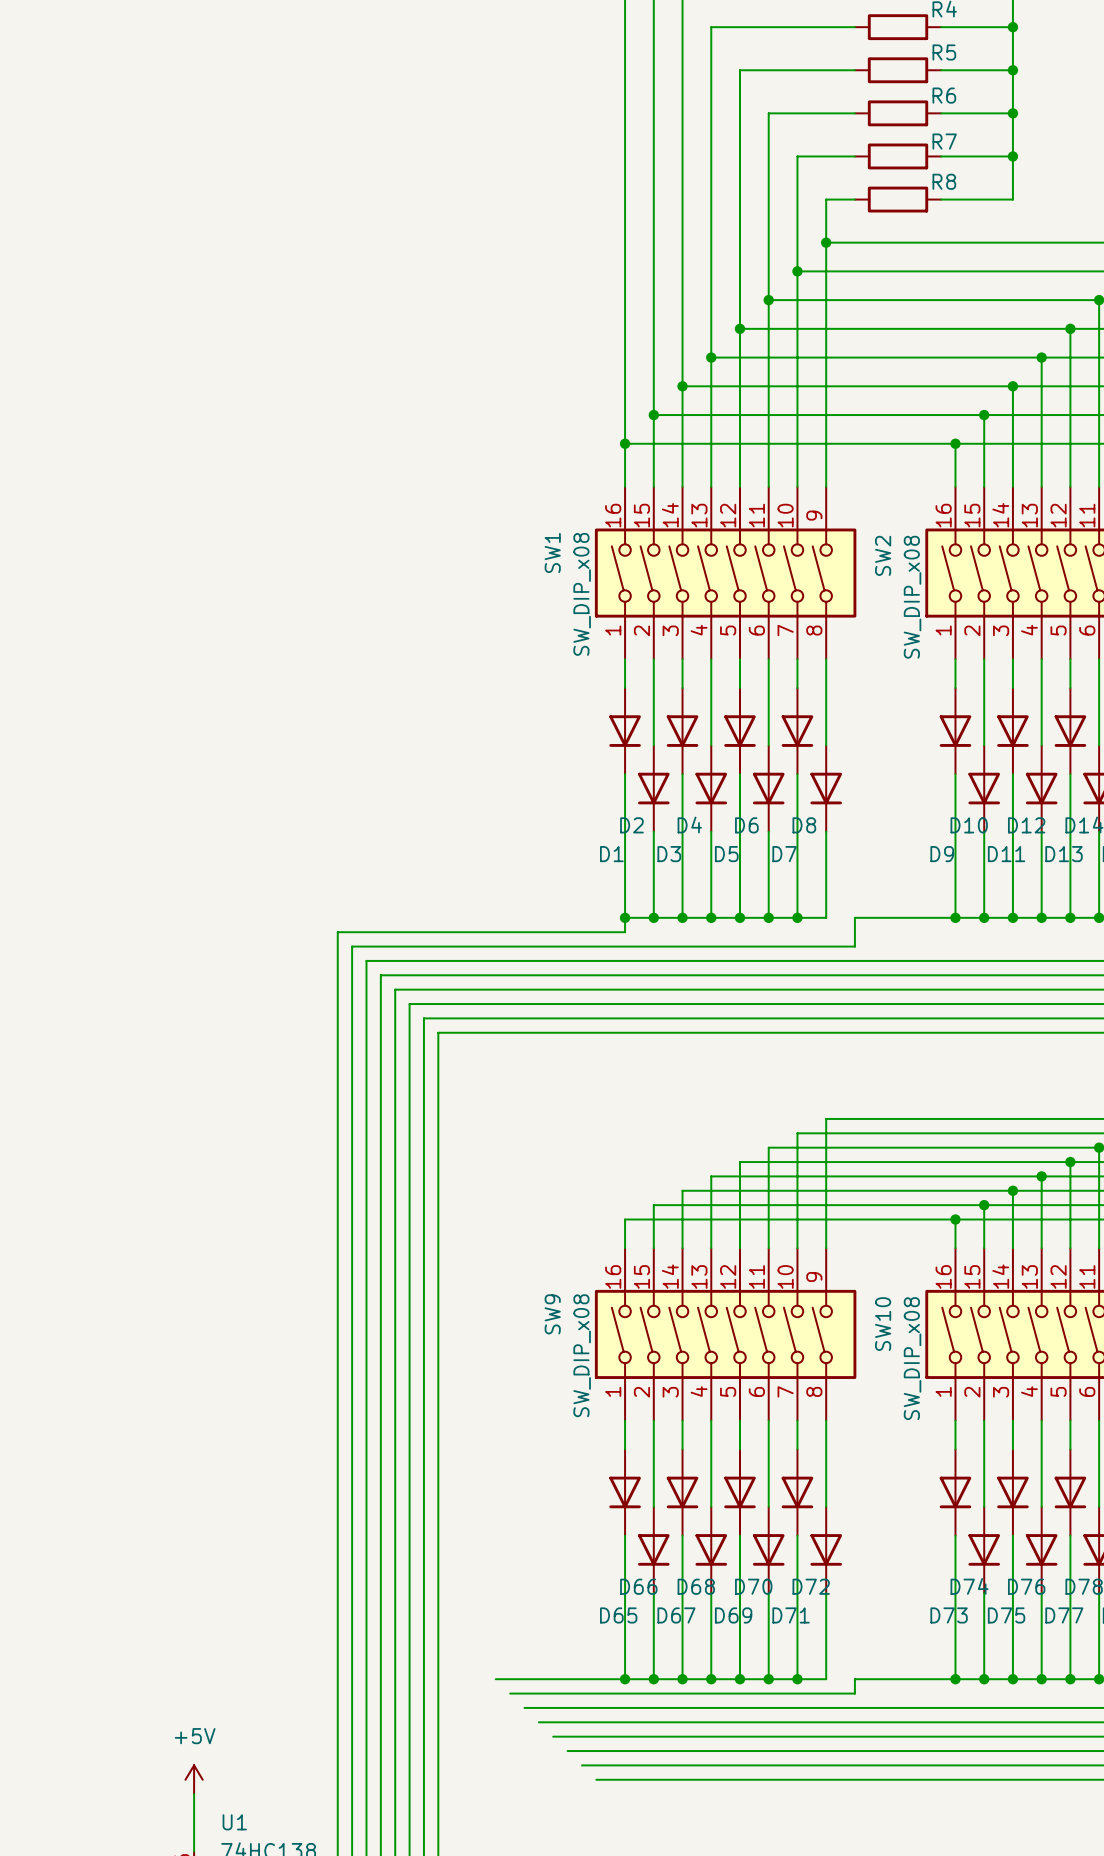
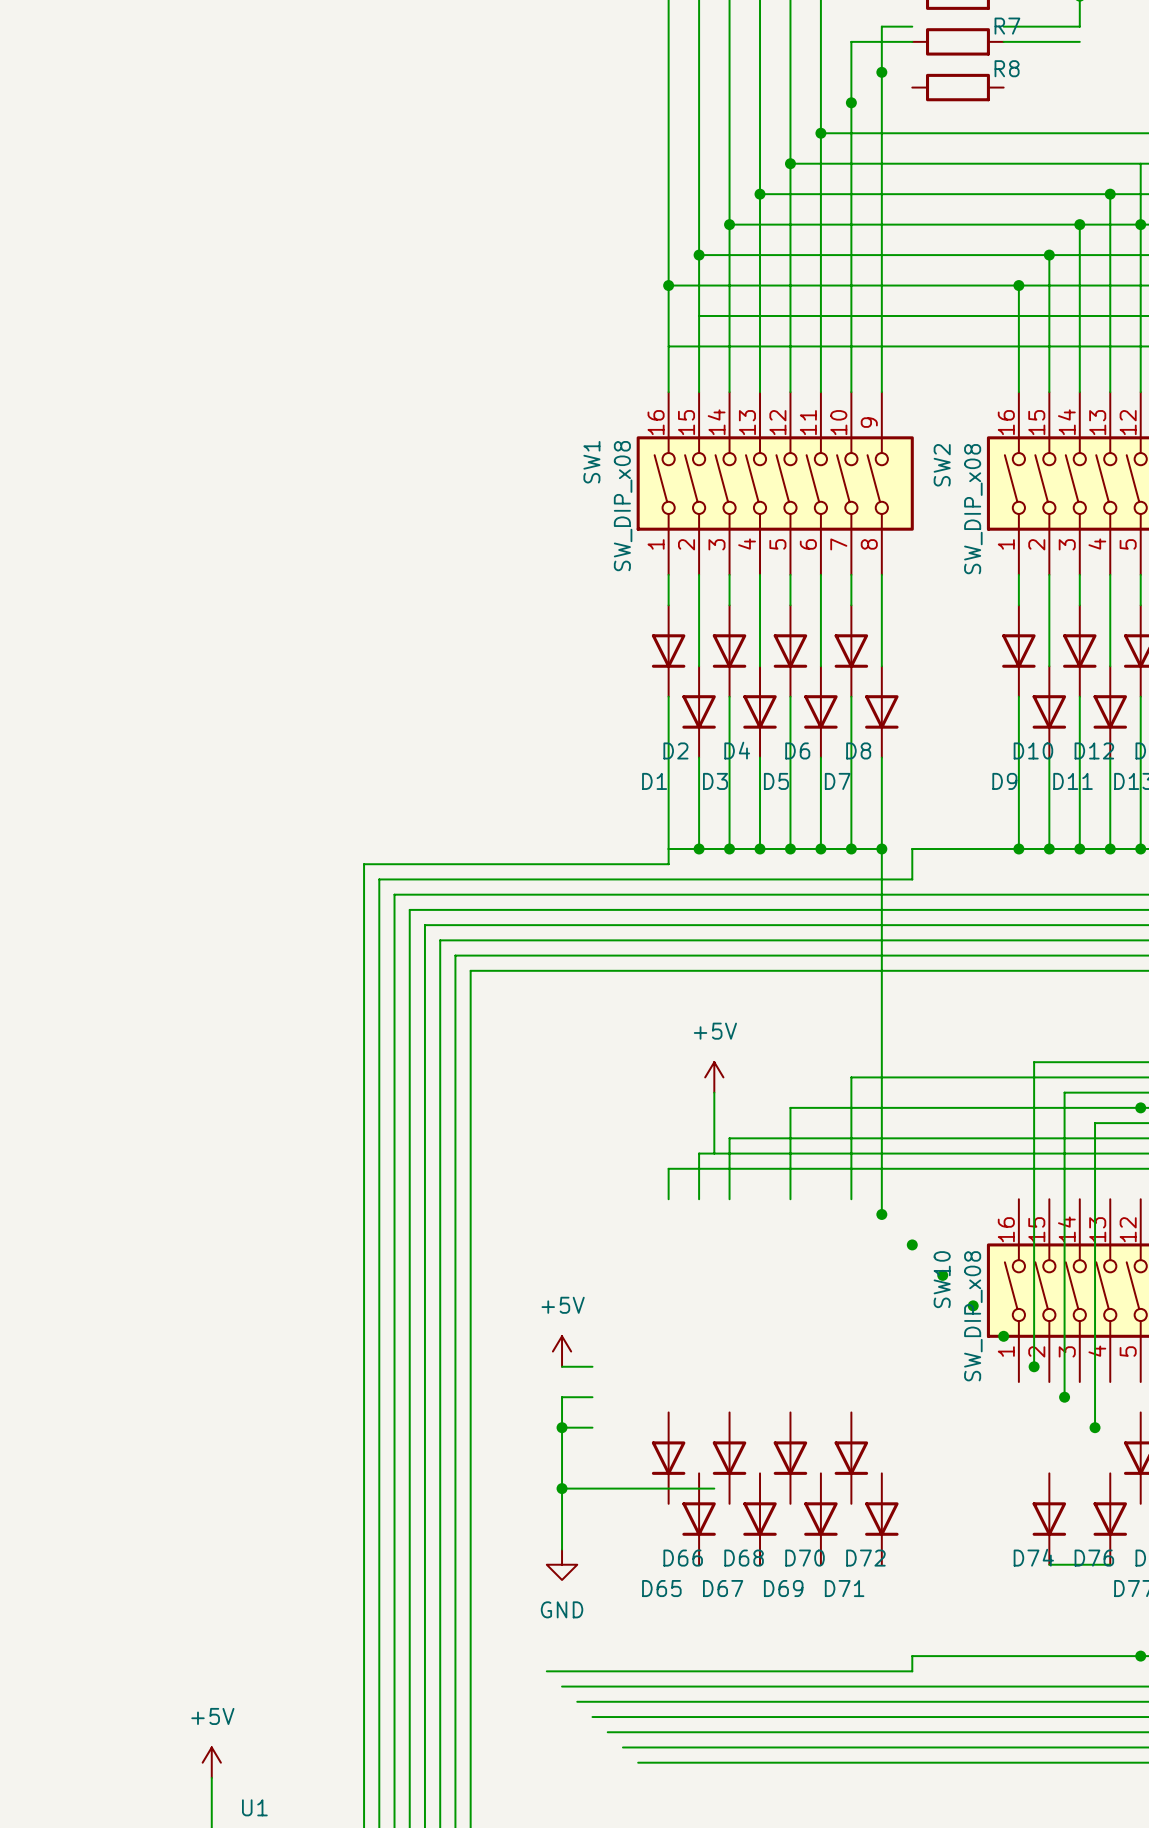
wire: (1012, 142) (1012, 199) (941, 199) -> (1079, 26) (1003, 26)
junction: (1012, 156) -> none
junction: none -> (881, 72)
wire: (826, 199) (854, 199) -> (881, 87) (881, 26) (912, 26)
junction: none -> (851, 102)
wire: none -> (820, 133) (881, 133)
junction: none -> (820, 133)
junction: (826, 242) -> none
wire: none -> (790, 163) (851, 163)
junction: none -> (790, 163)
junction: (797, 271) -> none
wire: none -> (1140, 163) (1140, 224)
wire: none -> (760, 194) (820, 194)
junction: none -> (760, 194)
junction: (768, 300) -> none
wire: none -> (1110, 194) (1110, 255)
junction: none -> (1110, 194)
wire: none -> (729, 224) (790, 224)
junction: none -> (729, 224)
junction: (739, 328) -> none
wire: none -> (1079, 224) (1079, 285)
junction: none -> (1079, 224)
wire: none -> (699, 255) (760, 255)
junction: none -> (699, 255)
junction: (711, 357) -> none
wire: none -> (1049, 255) (1049, 315)
junction: none -> (1049, 255)
junction: (1041, 357) -> none
wire: none -> (668, 285) (729, 285)
junction: none -> (668, 285)
junction: (682, 386) -> none
wire: none -> (1018, 285) (1018, 346)
junction: none -> (1018, 285)
junction: (1012, 386) -> none
junction: (653, 415) -> none
junction: (984, 415) -> none
junction: (625, 443) -> none
junction: (955, 443) -> none
junction: (625, 917) -> none
junction: none -> (881, 848)
wire: (826, 1118) (969, 1118) -> (881, 1062) (881, 848)
wire: none -> (1034, 1062) (1034, 1366)
power symbol: none -> +5V (714, 1077)
wire: none -> (714, 1092) (714, 1153)
wire: (998, 1147) (768, 1147) (768, 1248) -> (1064, 1092) (1064, 1397)
wire: (1070, 1162) (1070, 1248) -> none
wire: (1027, 1176) (711, 1176) (711, 1248) -> (1095, 1123) (1095, 1427)
wire: (1041, 1176) (1041, 1248) -> none
junction: (1041, 1176) -> none
wire: (1012, 1190) (1012, 1248) -> none
junction: (1012, 1190) -> none
wire: (984, 1205) (984, 1248) -> none
junction: (984, 1205) -> none
wire: (955, 1219) (955, 1248) -> none
junction: (955, 1219) -> none
junction: none -> (881, 1214)
junction: none -> (912, 1244)
junction: none -> (942, 1275)
SW9: SW_DIP_x08 (725, 1334) -> none
junction: none -> (973, 1305)
junction: none -> (1003, 1336)
power symbol: none -> +5V (562, 1351)
wire: none -> (562, 1366) (592, 1366)
junction: none -> (1034, 1366)
wire: (625, 1420) (625, 1449) -> none
wire: (653, 1420) (653, 1506) -> none
wire: (682, 1420) (682, 1449) -> none
wire: (711, 1420) (711, 1506) -> none
wire: (739, 1420) (739, 1449) -> none
wire: (768, 1420) (768, 1506) -> none
wire: (797, 1420) (797, 1449) -> none
wire: (826, 1420) (826, 1506) -> none
wire: (955, 1420) (955, 1449) -> none
wire: (984, 1420) (984, 1506) -> none
wire: (1012, 1420) (1012, 1449) -> none
wire: (1041, 1420) (1041, 1506) -> none
wire: (1070, 1420) (1070, 1449) -> none
wire: none -> (592, 1397) (562, 1397) (562, 1549)
junction: none -> (1064, 1397)
wire: none -> (562, 1427) (592, 1427)
junction: none -> (562, 1427)
junction: none -> (1095, 1427)
D73: (955, 1492) -> none
D75: (1012, 1492) -> none
wire: none -> (562, 1488) (714, 1488)
junction: none -> (562, 1488)
wire: (625, 1535) (625, 1679) -> none
wire: (682, 1535) (682, 1679) -> none
wire: (739, 1535) (739, 1679) -> none
wire: (797, 1535) (797, 1679) -> none
wire: (955, 1535) (955, 1679) -> none
wire: (1012, 1535) (1012, 1679) -> none
wire: (1070, 1535) (1070, 1679) -> none
power symbol: none -> GND (562, 1564)
wire: (653, 1593) (653, 1679) -> none
wire: (711, 1593) (711, 1679) -> none
wire: (768, 1593) (768, 1679) -> none
wire: (826, 1593) (826, 1679) (495, 1679) -> none
wire: (984, 1593) (984, 1679) -> (1049, 1564) (1110, 1564)
wire: (1041, 1593) (1041, 1679) -> none
junction: (625, 1679) -> none
junction: (653, 1679) -> none
junction: (682, 1679) -> none
junction: (711, 1679) -> none
junction: (739, 1679) -> none
junction: (768, 1679) -> none
junction: (797, 1679) -> none
junction: (955, 1679) -> none
junction: (984, 1679) -> none
junction: (1012, 1679) -> none
junction: (1041, 1679) -> none

